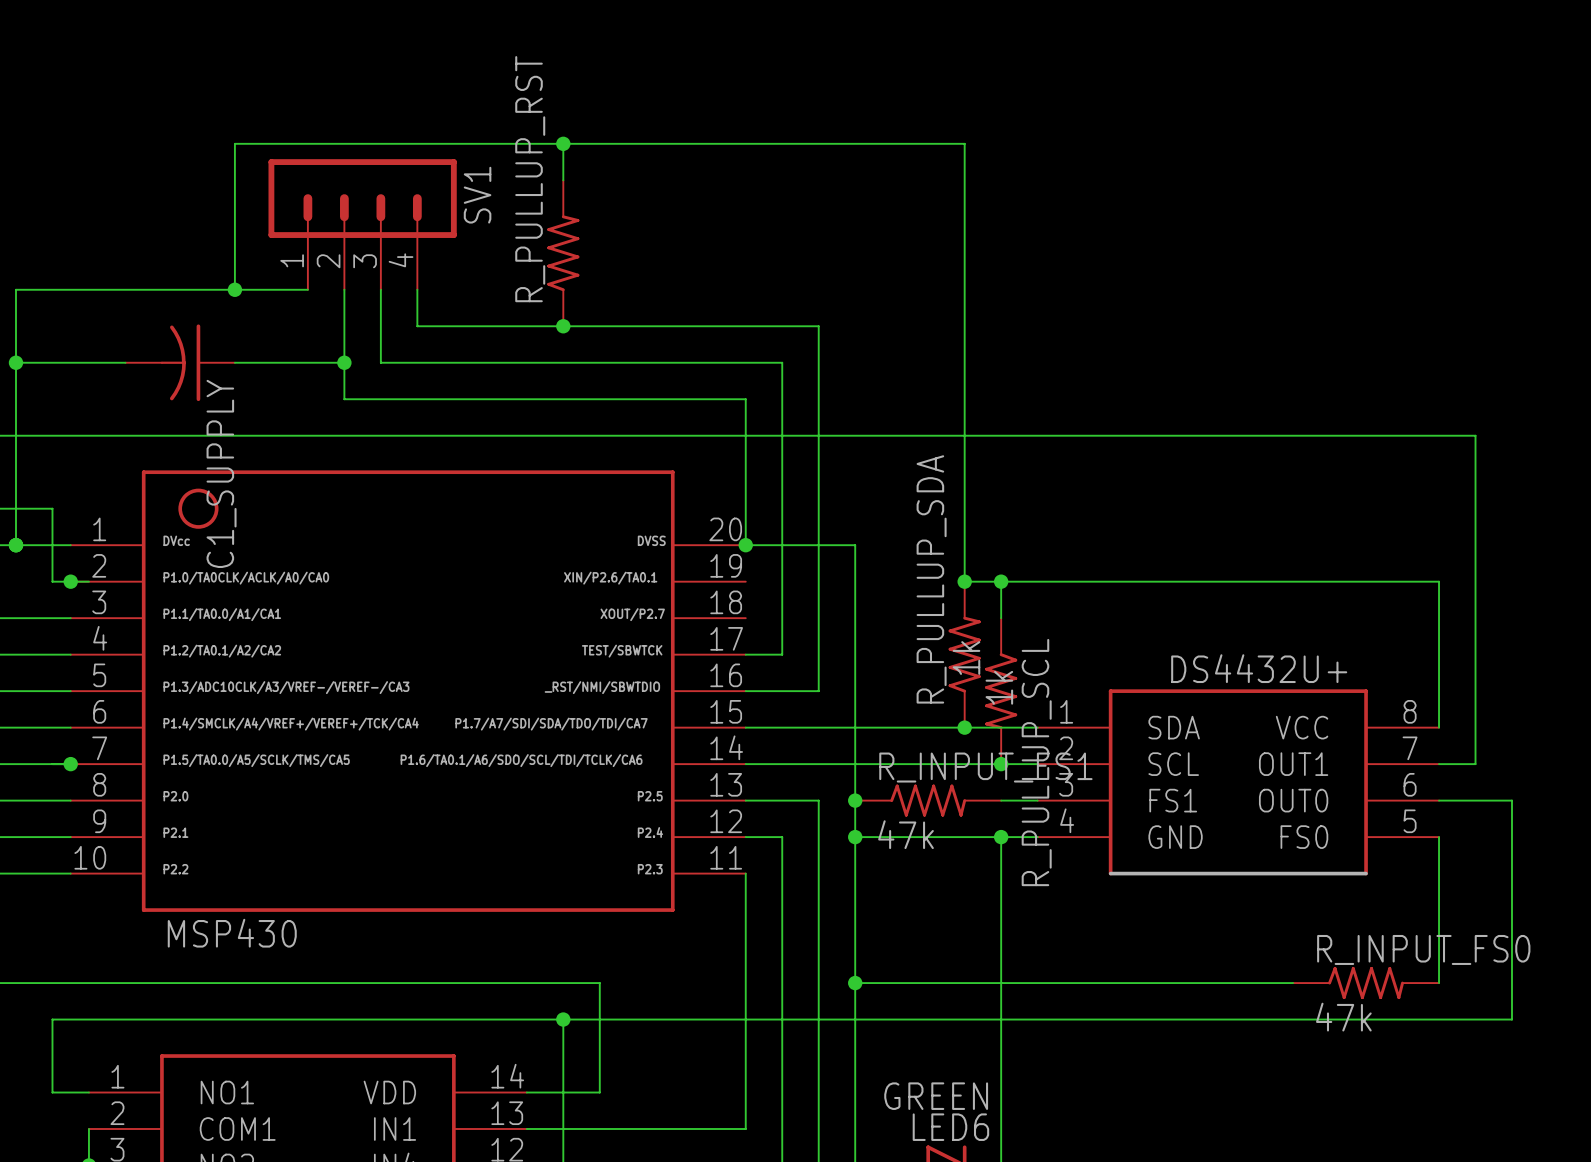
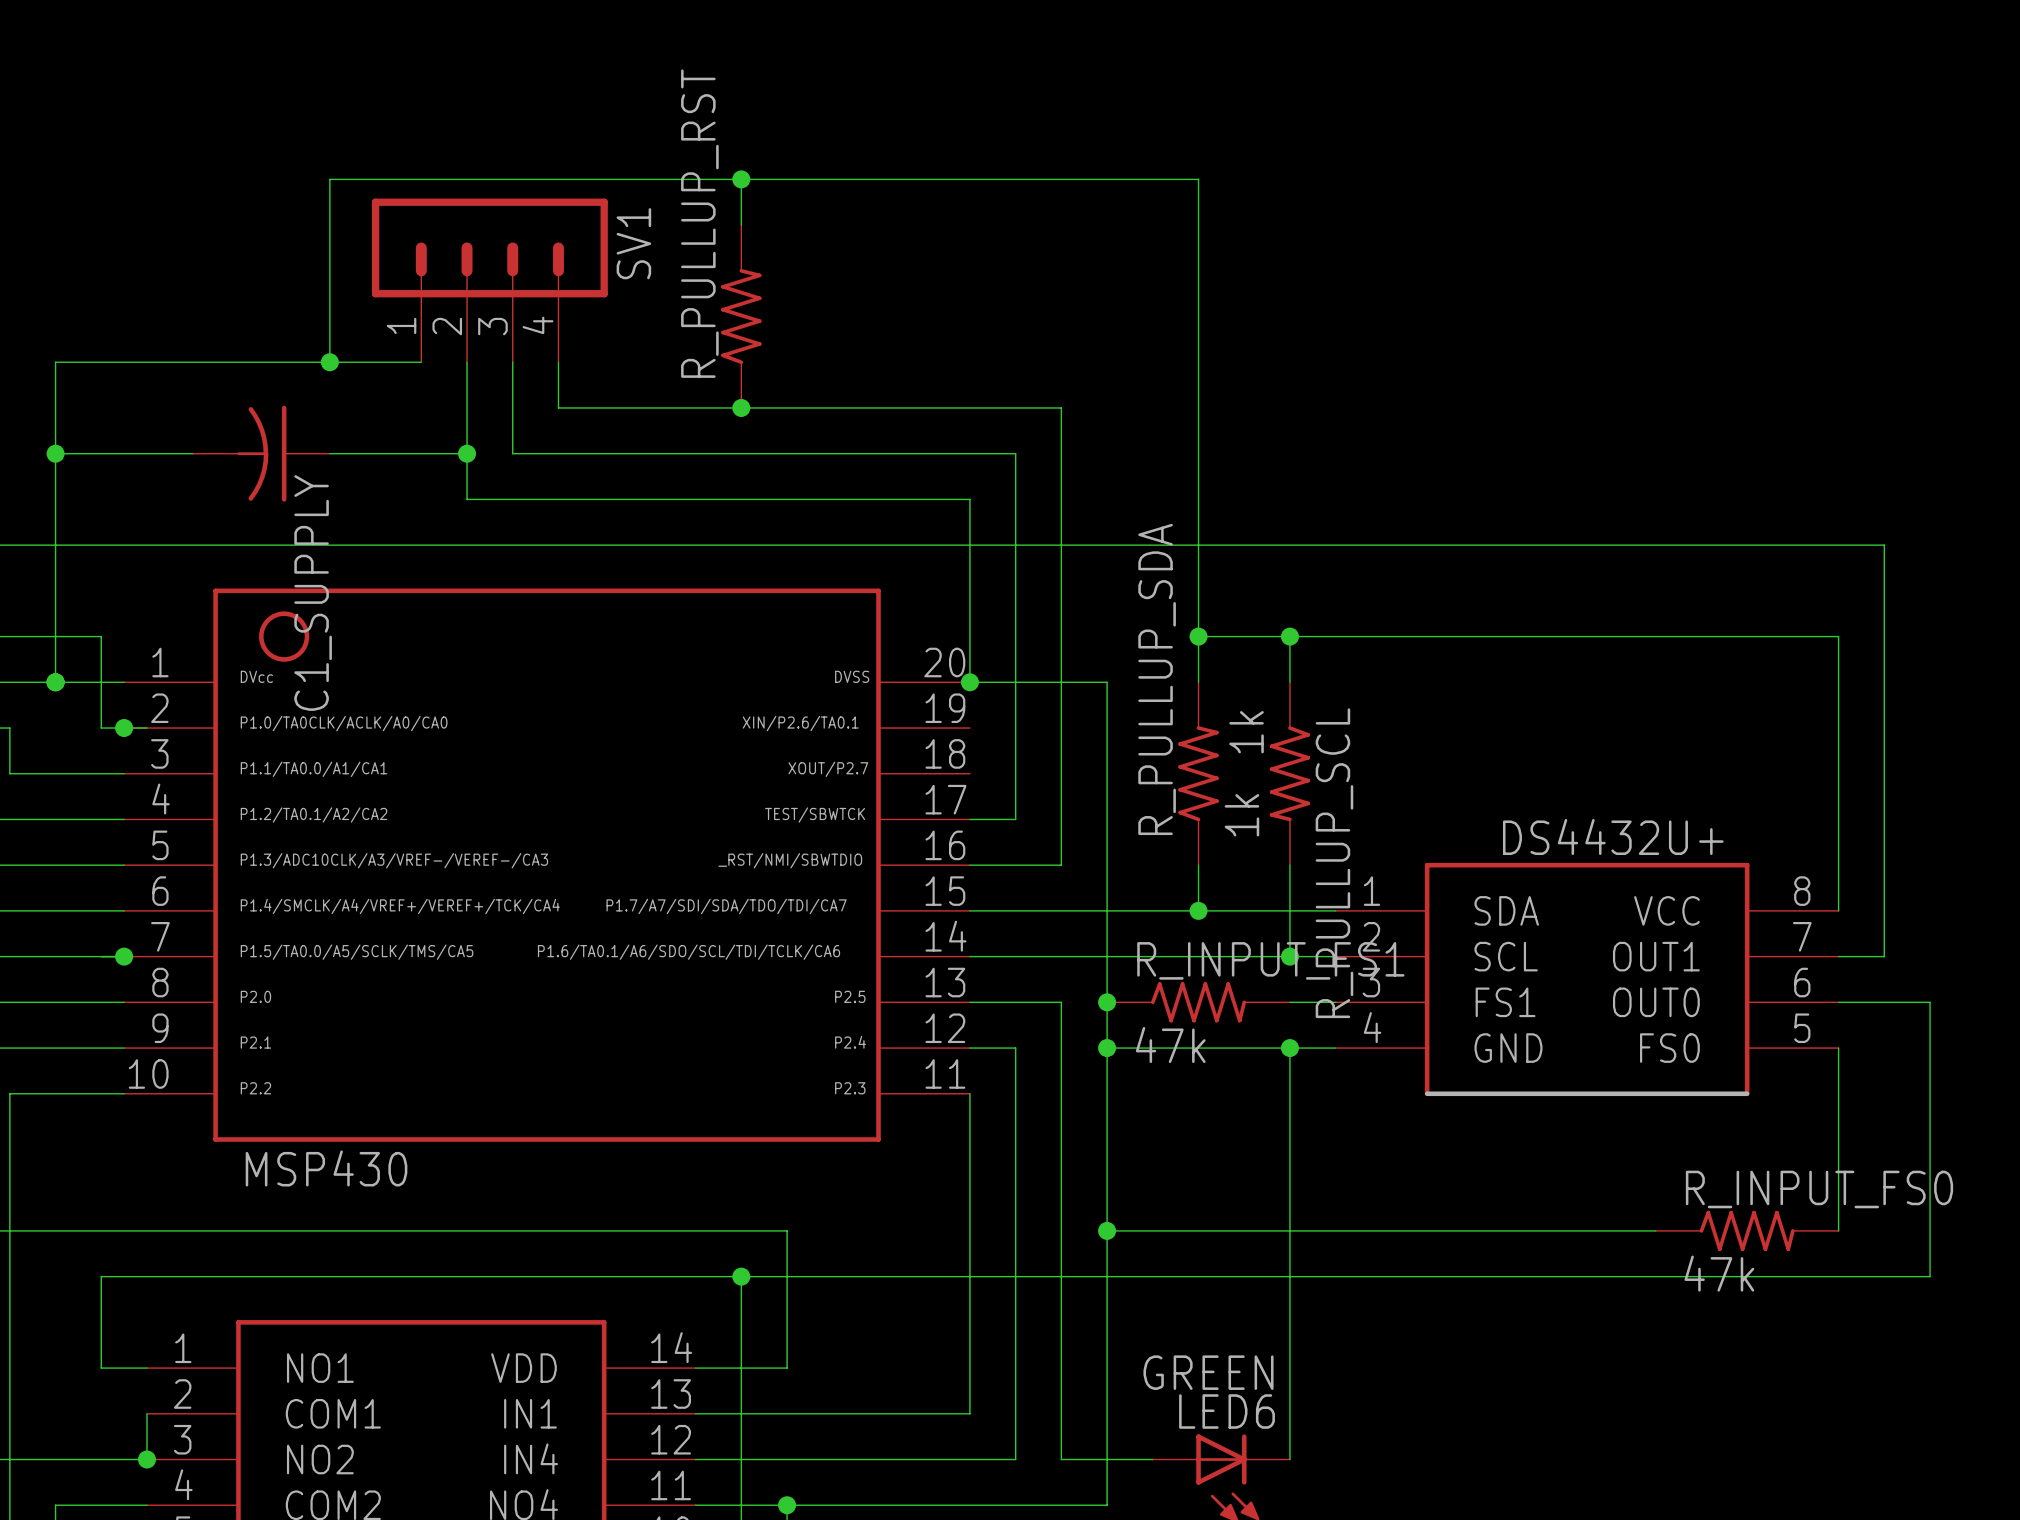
wire: (928, 143) (964, 143) (964, 581) (1439, 581) -> (1198, 636) (1838, 636) (1838, 728)
wire: none -> (1198, 179) (1198, 682)
junction: none -> (1198, 636)
junction: none -> (1289, 636)
junction: (964, 581) -> none
wire: (1001, 581) (1001, 618) -> (1289, 636) (1289, 682)
junction: (1001, 581) -> none
R_PULLUP_SDA position: (964, 654) -> (1198, 773)
wire: none -> (1198, 865) (1198, 910)
R_PULLUP_SCL position: (1001, 691) -> (1289, 773)
junction position: (964, 727) -> (1198, 910)

